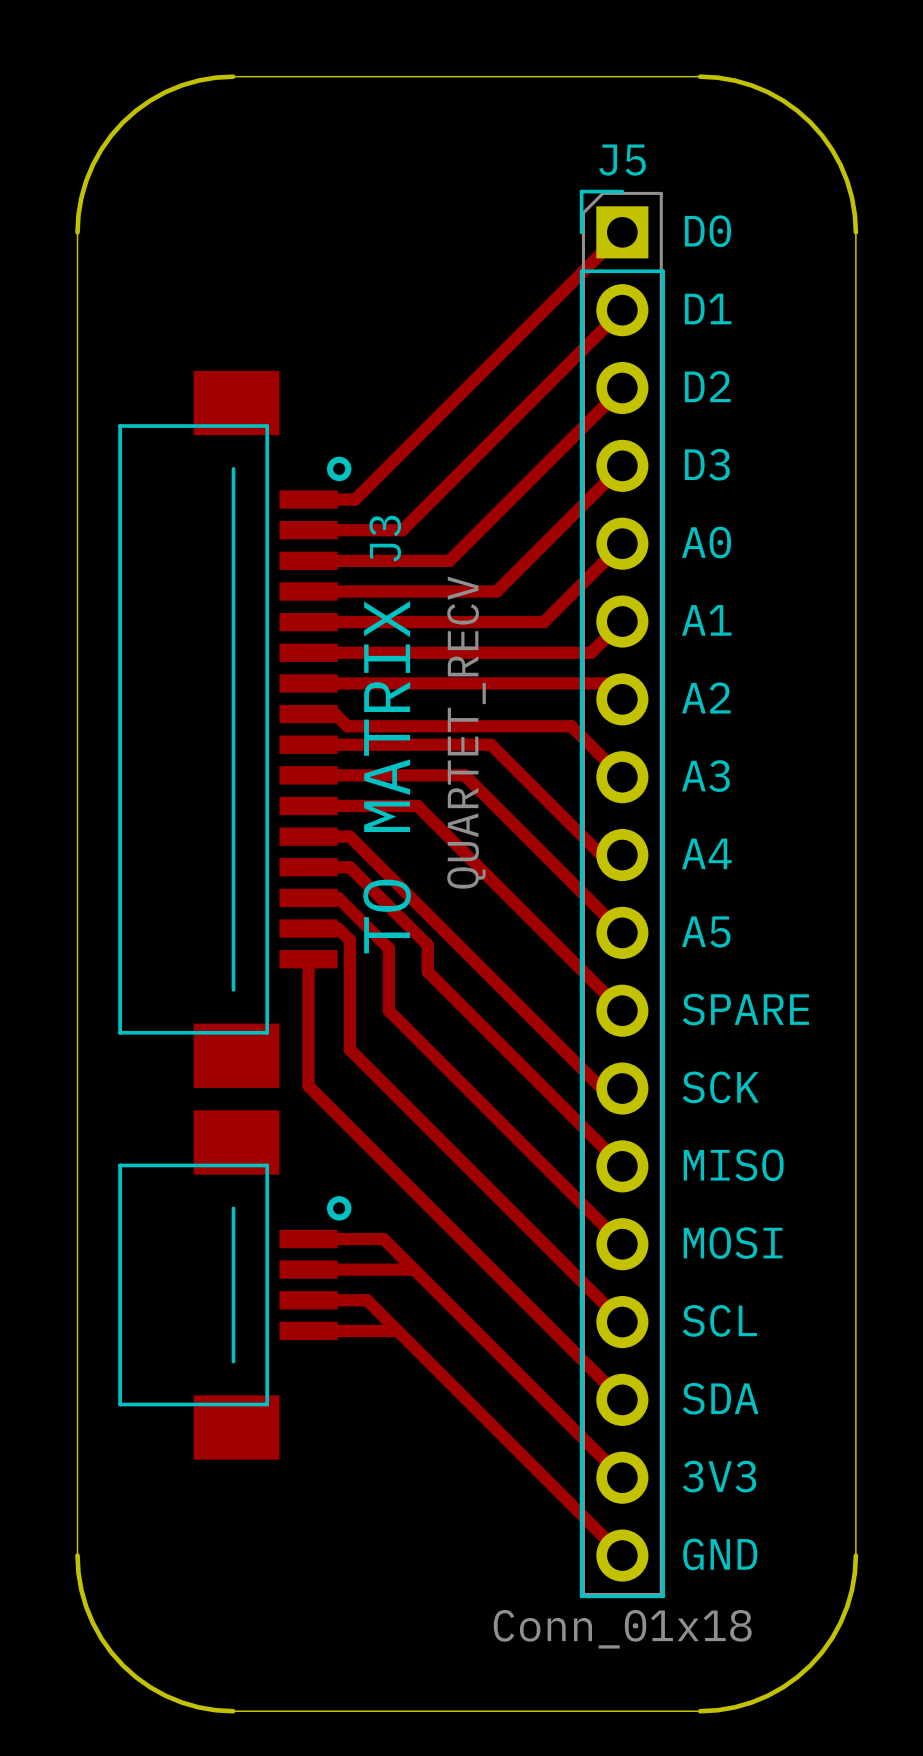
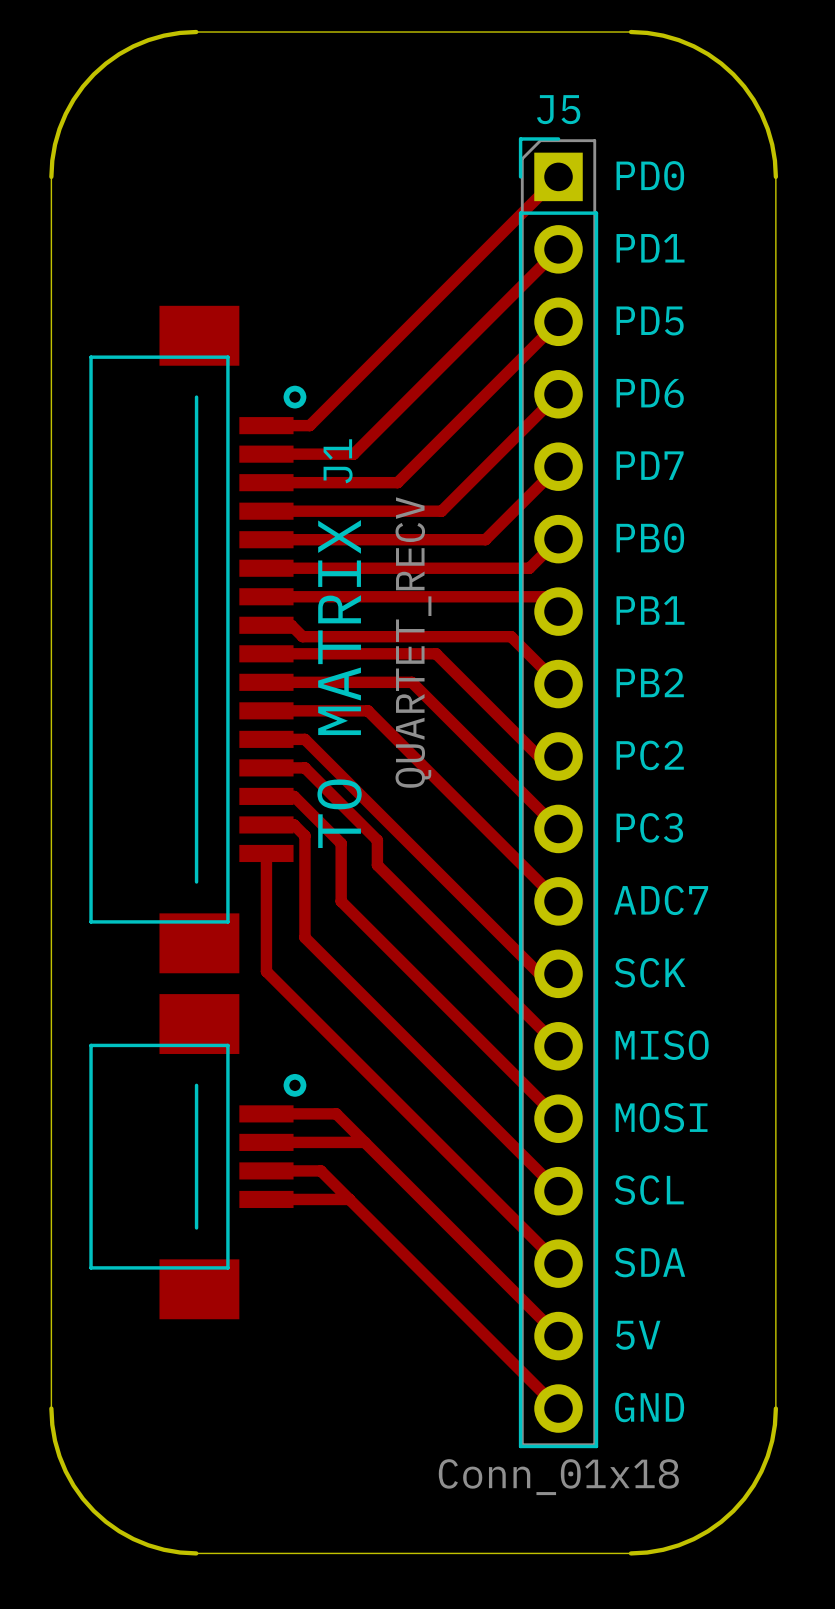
text: D0 (707, 231) -> PD0 (650, 175)
text: D1 (708, 309) -> PD1 (650, 248)
text: D2 (707, 386) -> PD5 (650, 320)
text: D3 (707, 464) -> PD6 (650, 393)
J3 name: J3 (385, 538) -> J1 (338, 461)
text: A0 (706, 542) -> PD7 (650, 465)
text: A1 (706, 620) -> PB0 (650, 538)
text: A2 (706, 697) -> PB1 (650, 610)
text: A3 (705, 776) -> PB2 (650, 682)
text: A4 (706, 853) -> PC2 (650, 755)
text: A5 (706, 931) -> PC3 (649, 827)
text: SPARE (745, 1009) -> ADC7 (661, 900)
text: 3V3 (719, 1476) -> 5V (638, 1335)

